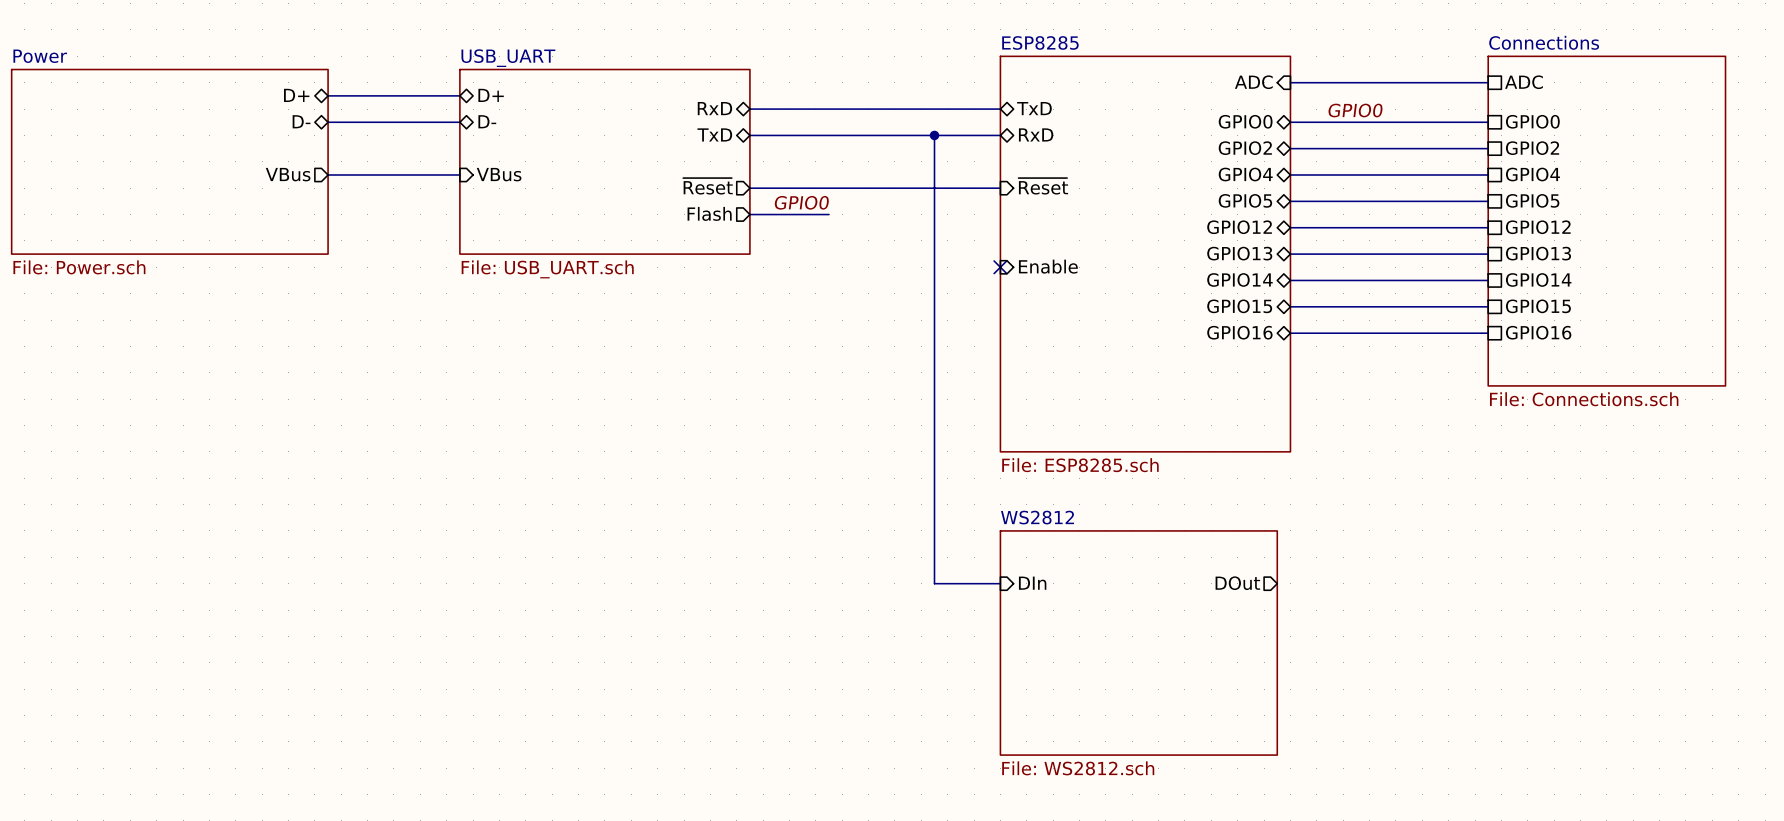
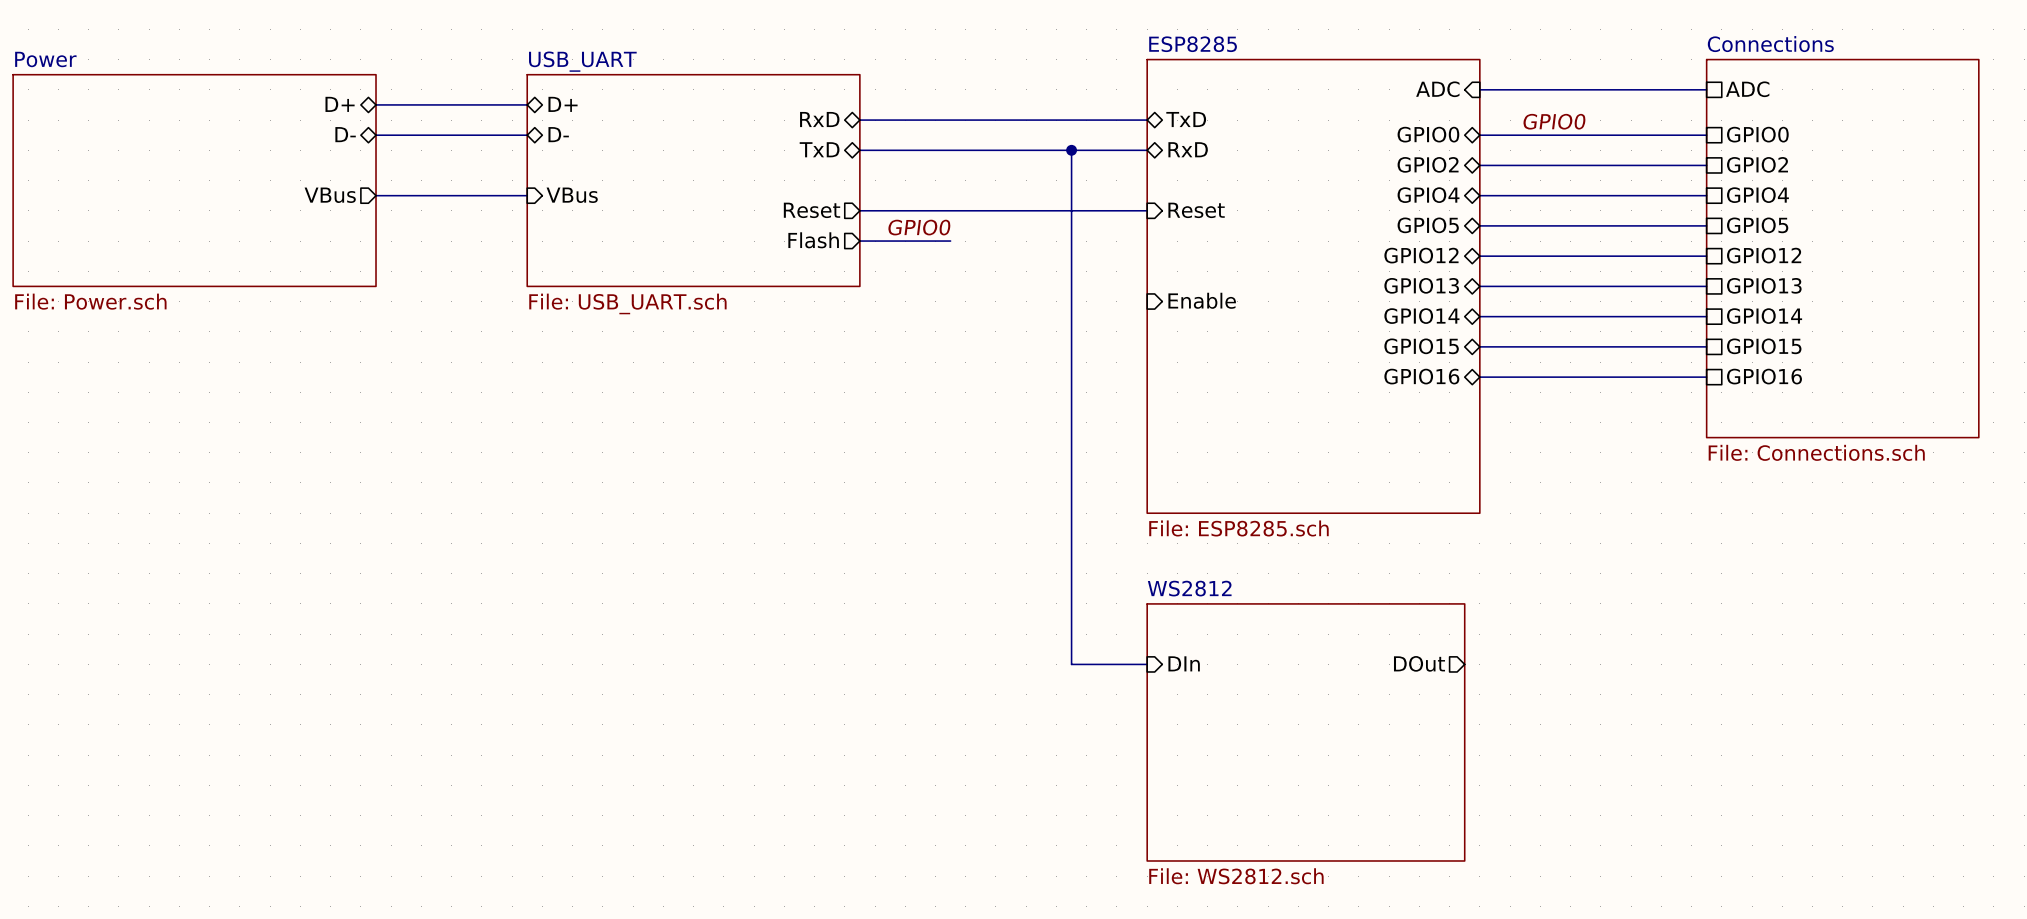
sheet pin: ~{Reset} (707, 186) -> Reset (812, 210)
sheet pin: ~{Reset} (1043, 186) -> Reset (1196, 210)
no-connect mark: (1000, 267) -> none

